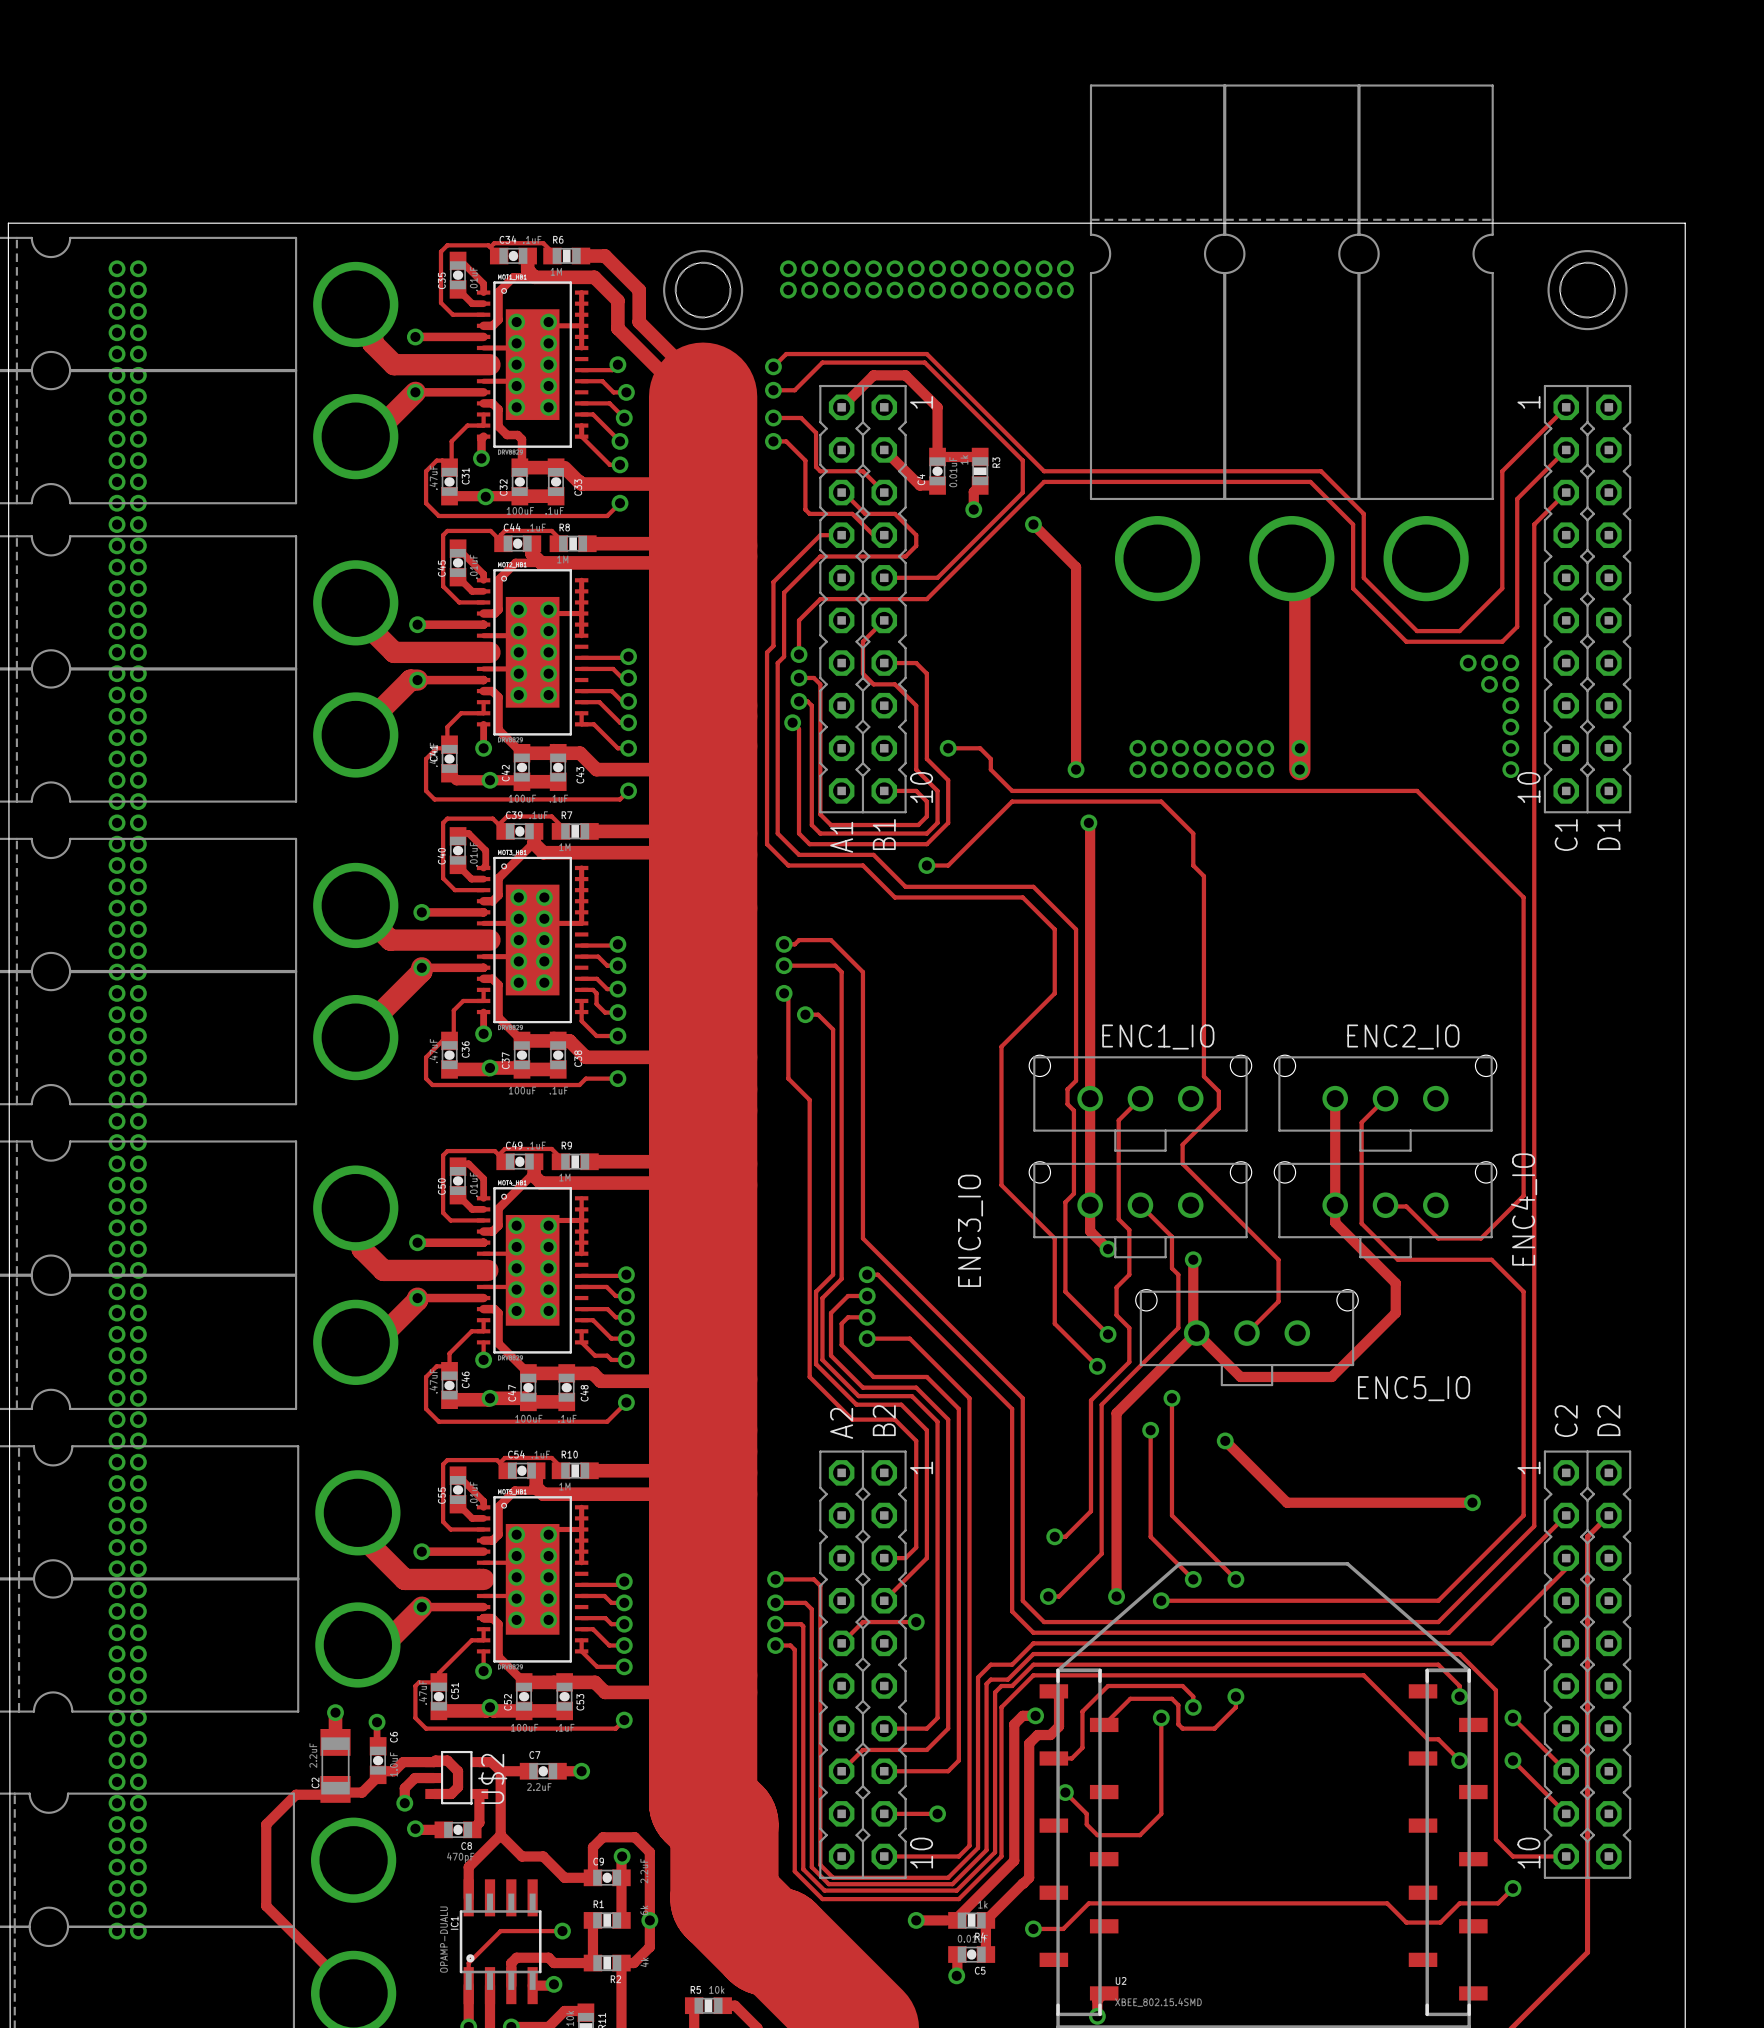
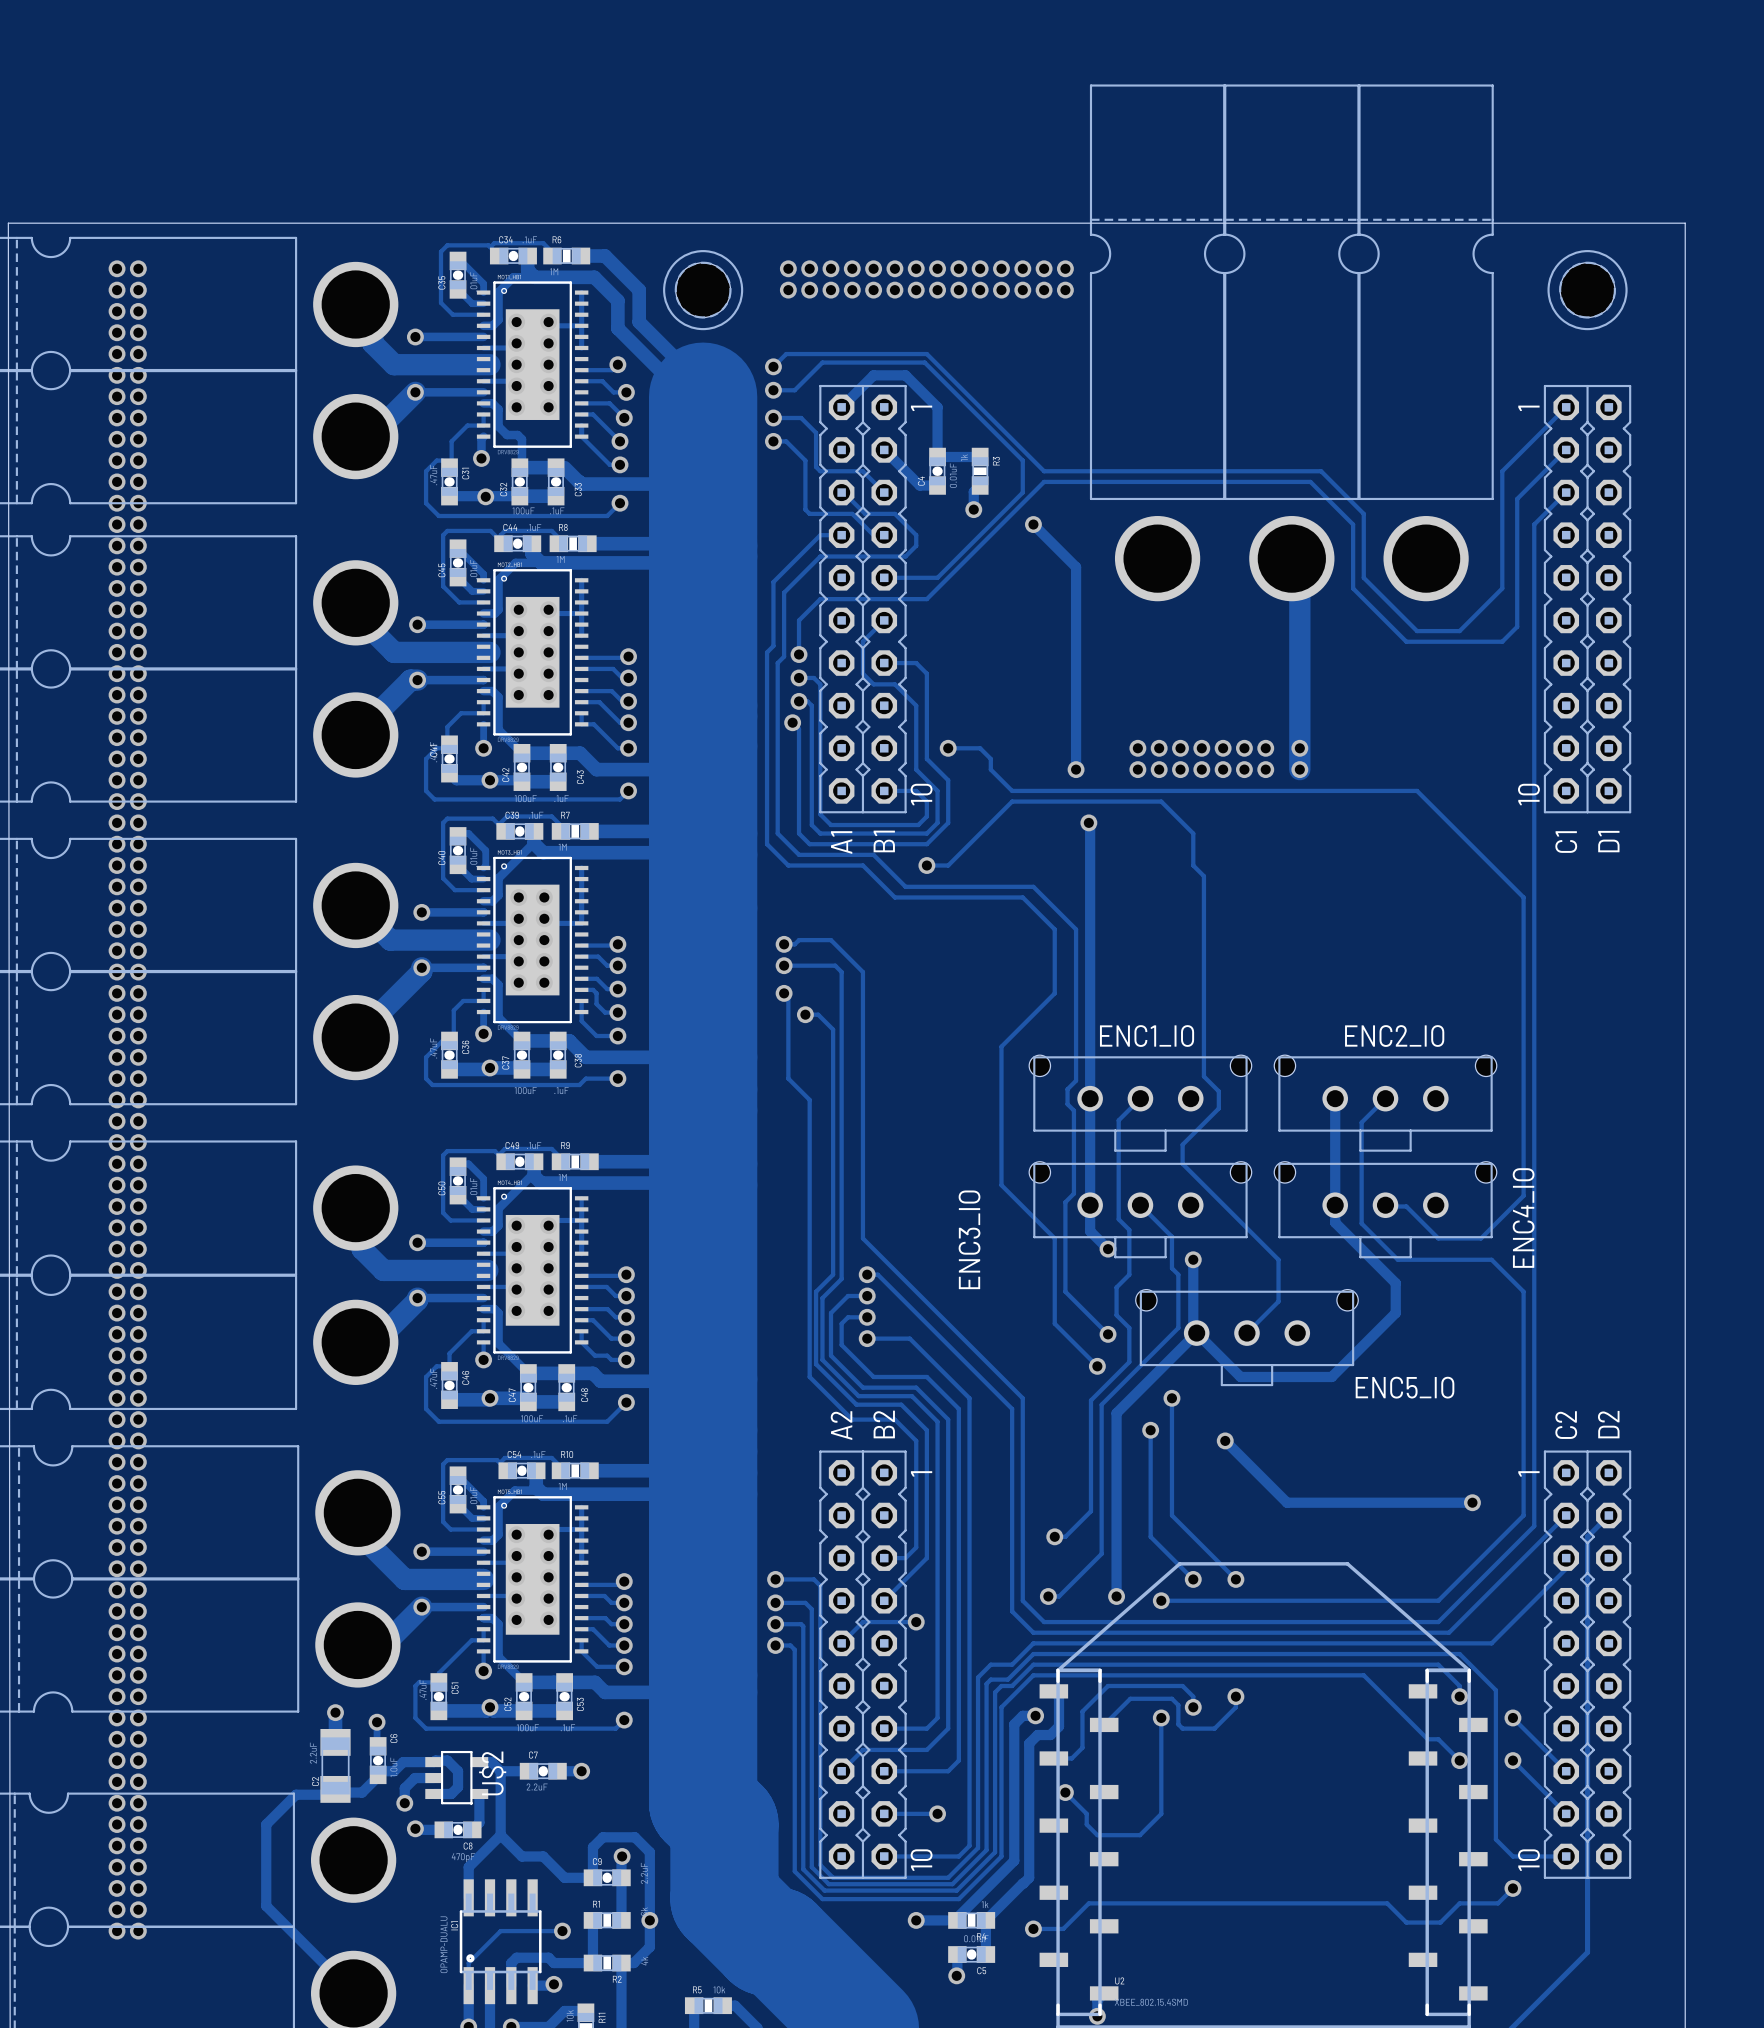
via: (1468, 663) -> none
via: (1489, 663) -> none
via: (1510, 663) -> none
via: (1489, 684) -> none
via: (1510, 684) -> none
via: (1510, 705) -> none
via: (1510, 726) -> none
via: (1510, 748) -> none
via: (1510, 769) -> none

